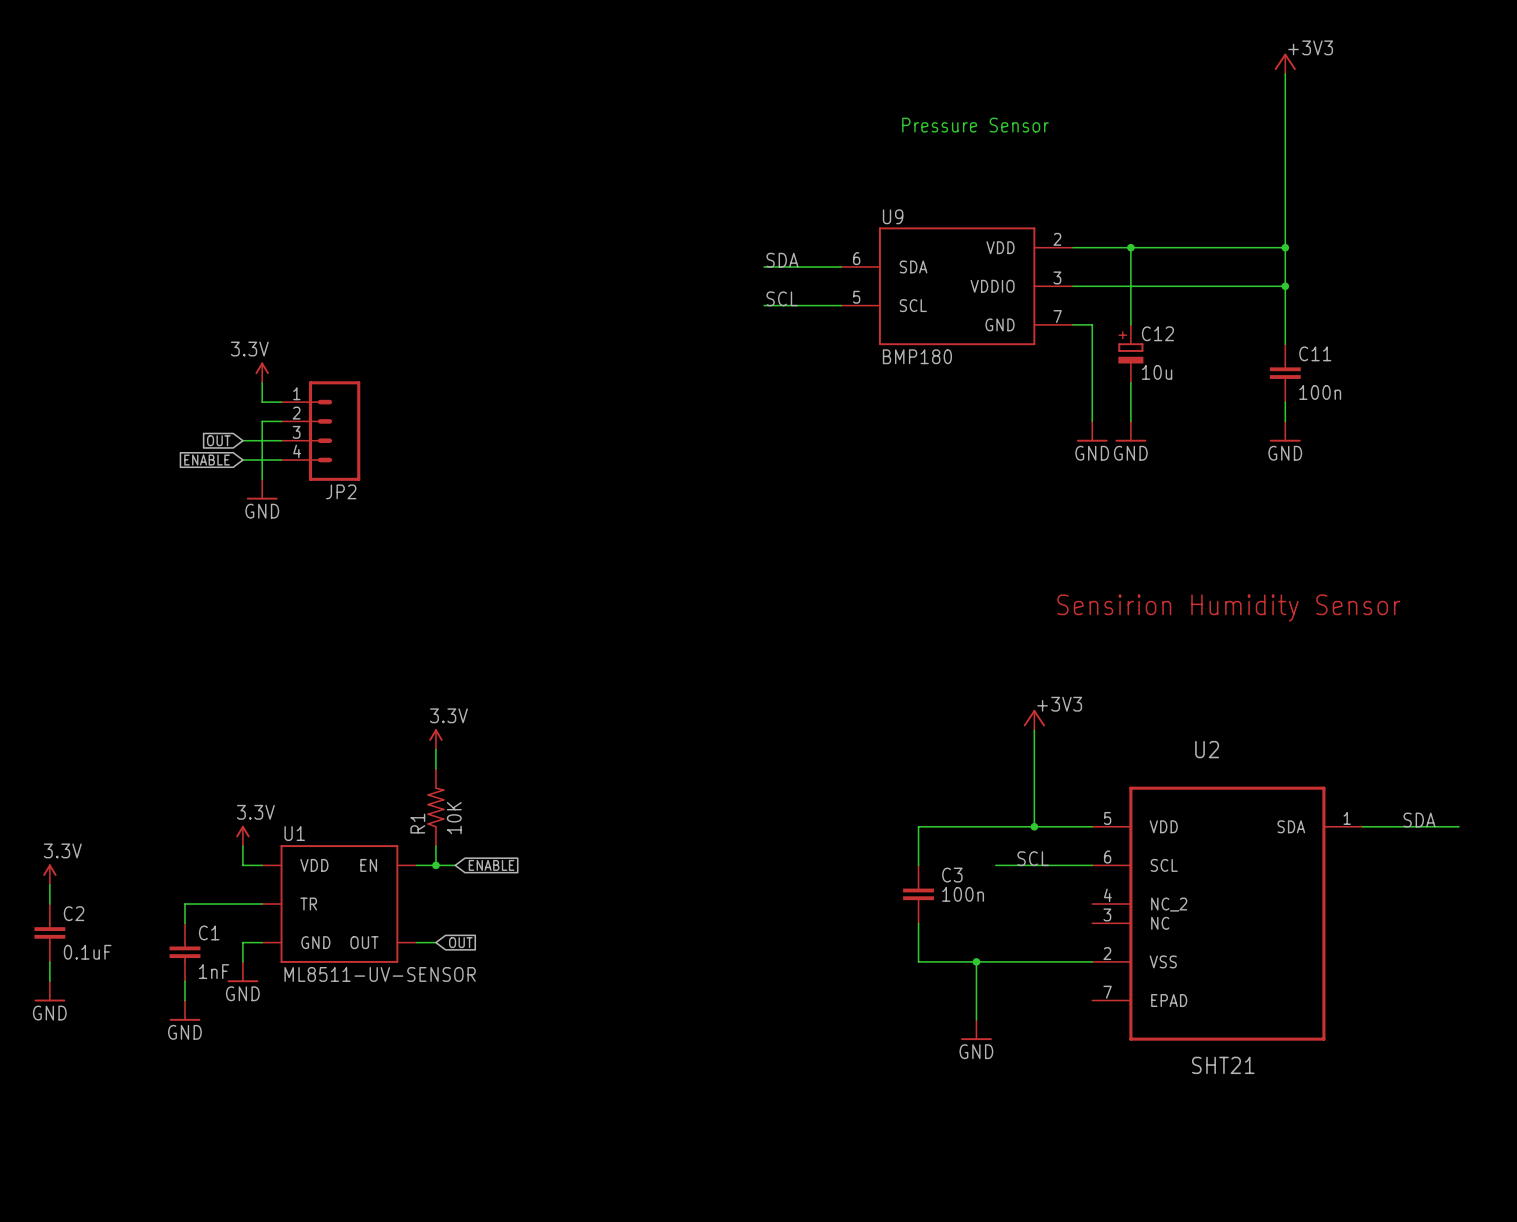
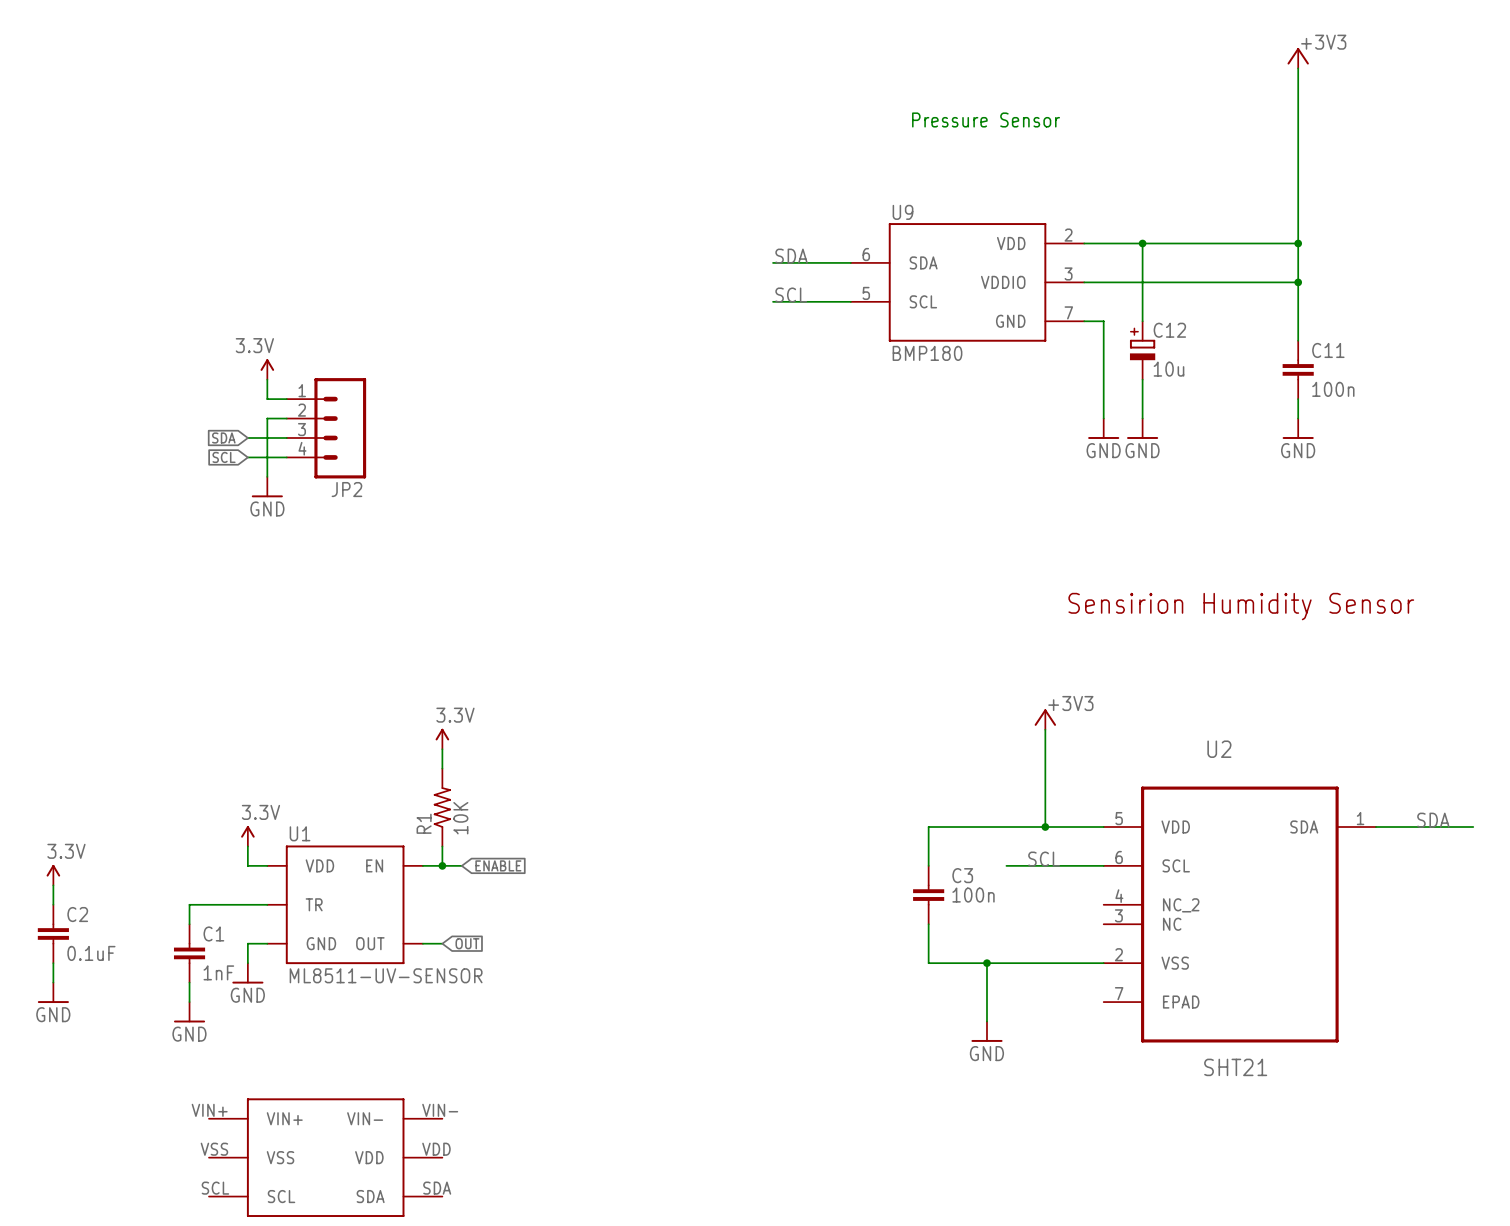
global label: OUT (218, 440) -> SDA (223, 437)
global label: ENABLE (207, 460) -> SCL (224, 457)
part: none -> (325, 1157)

